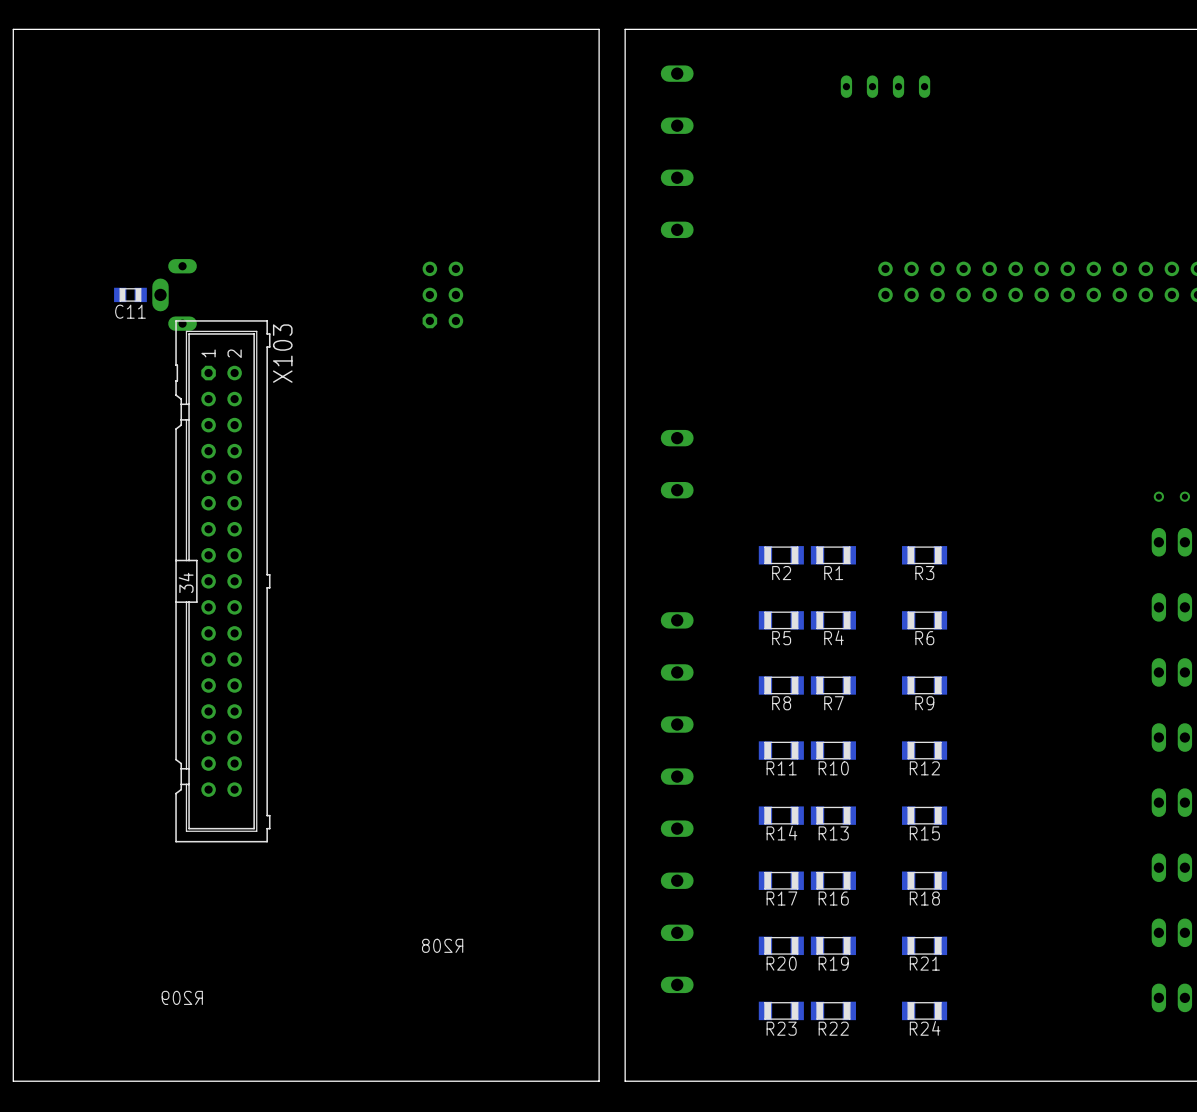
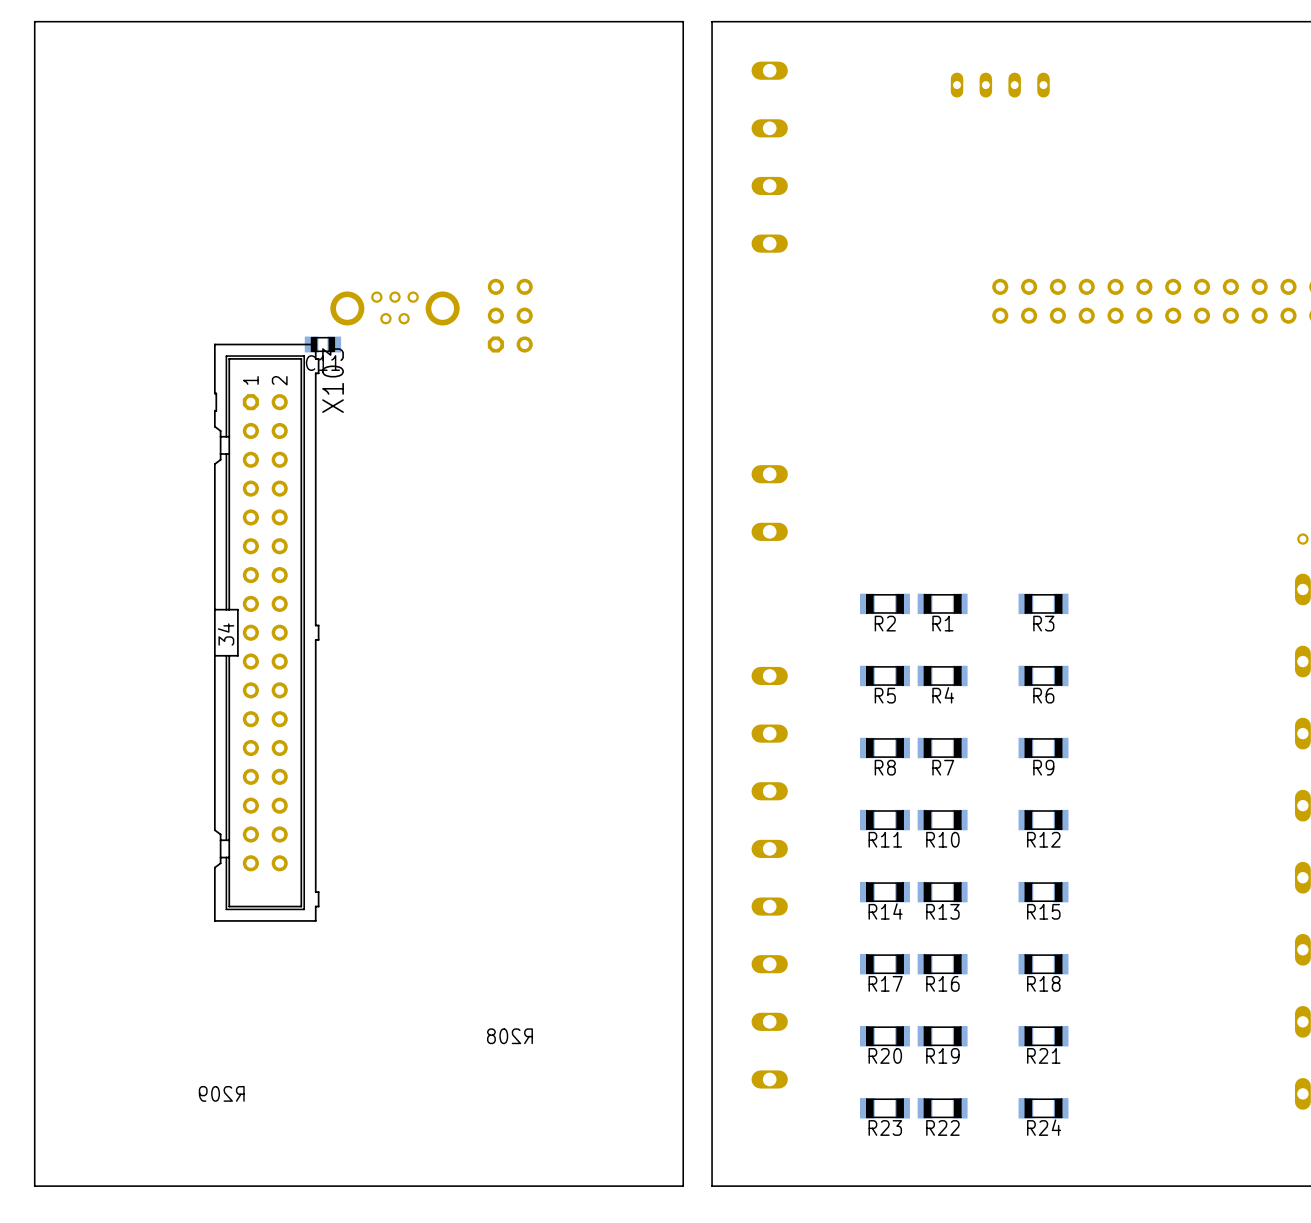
part: none -> (394, 308)
C11 position: (130, 294) -> (322, 344)
part: (174, 294) -> none

